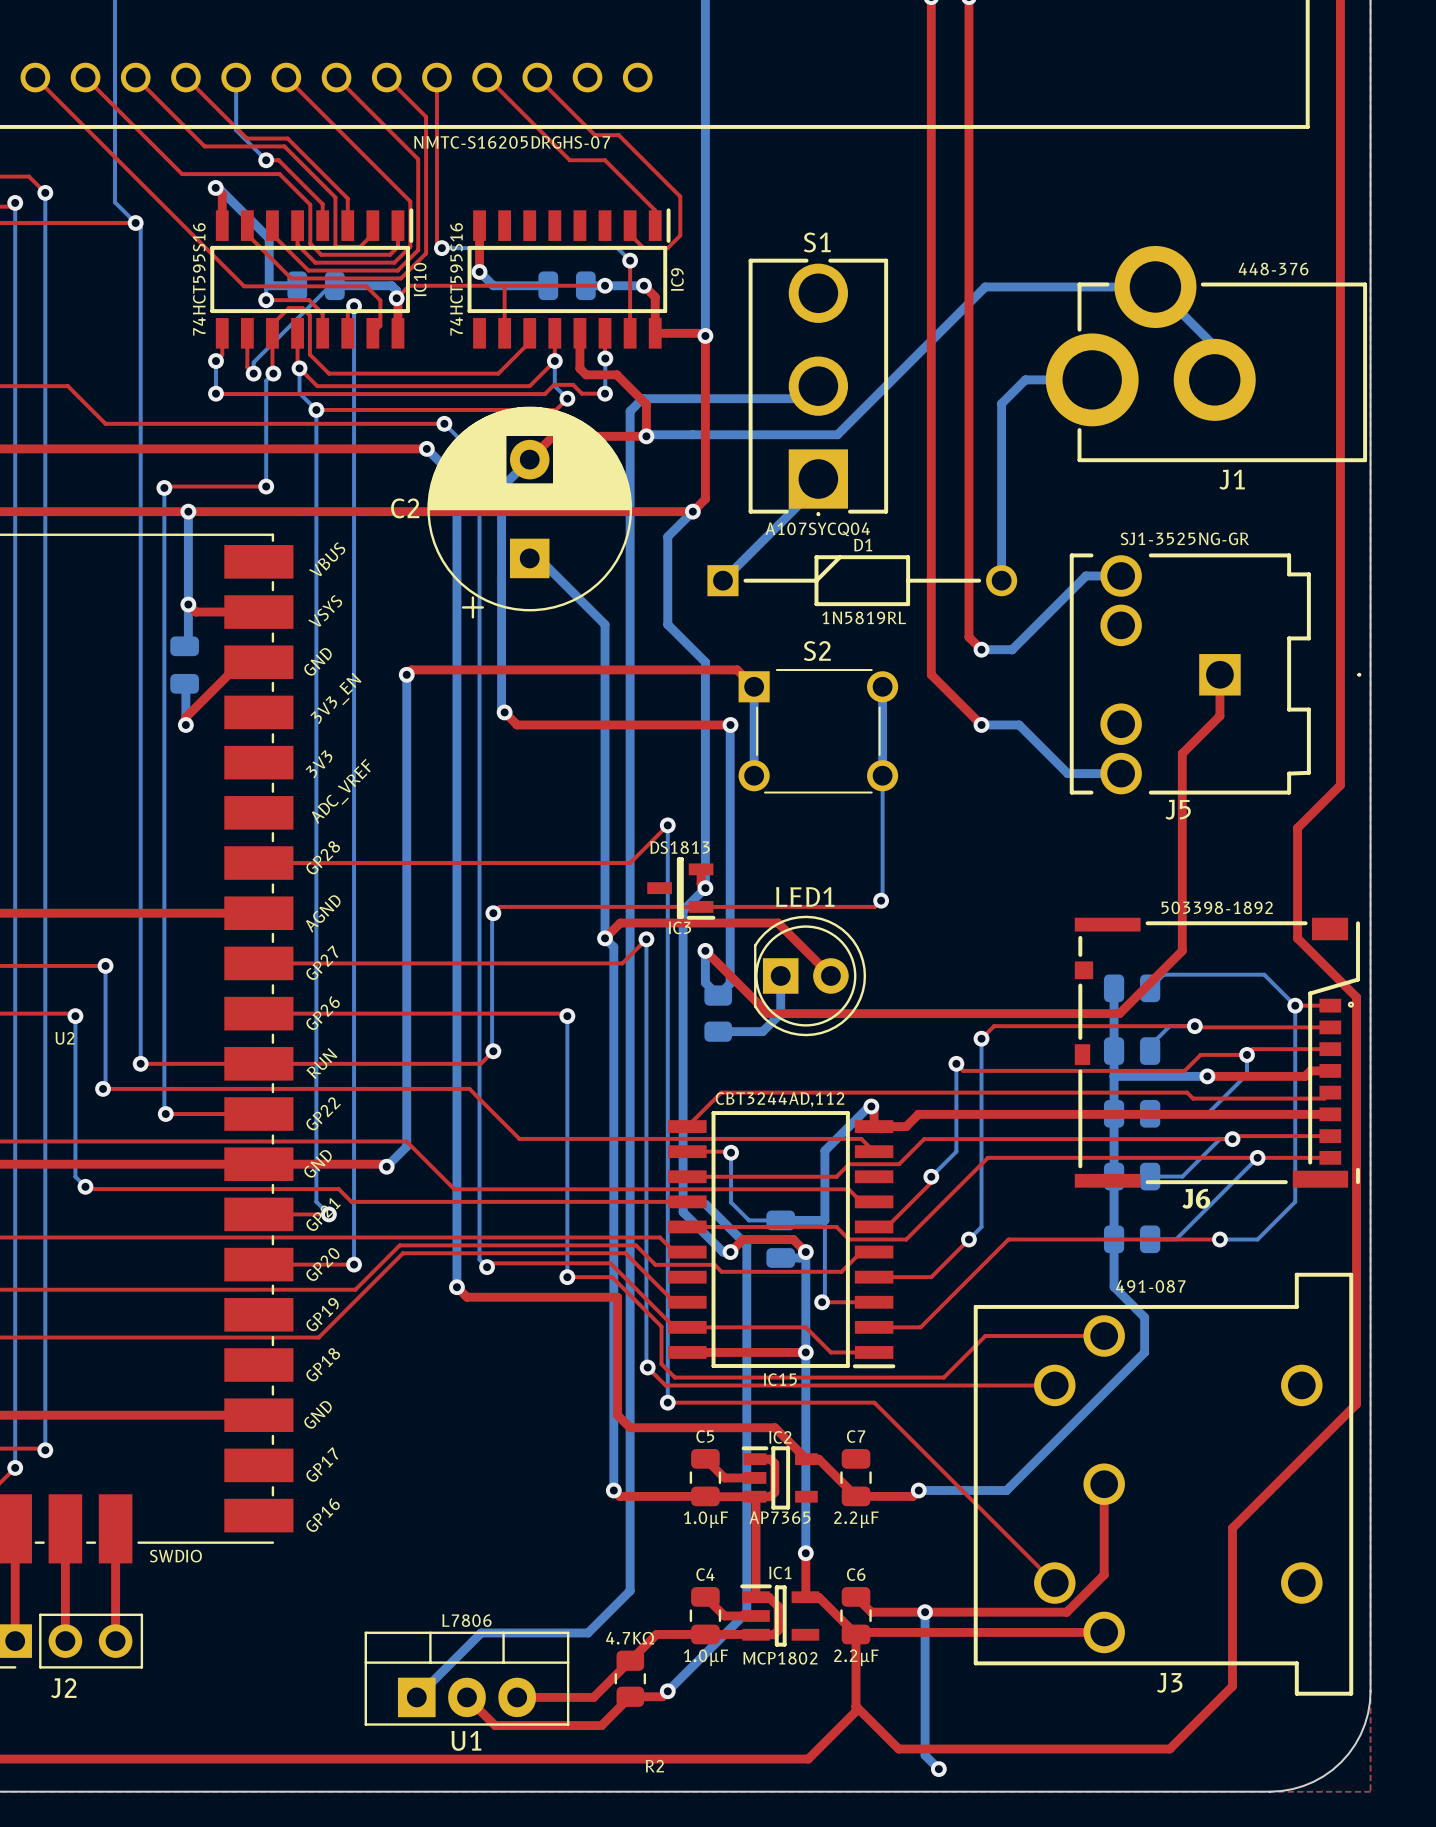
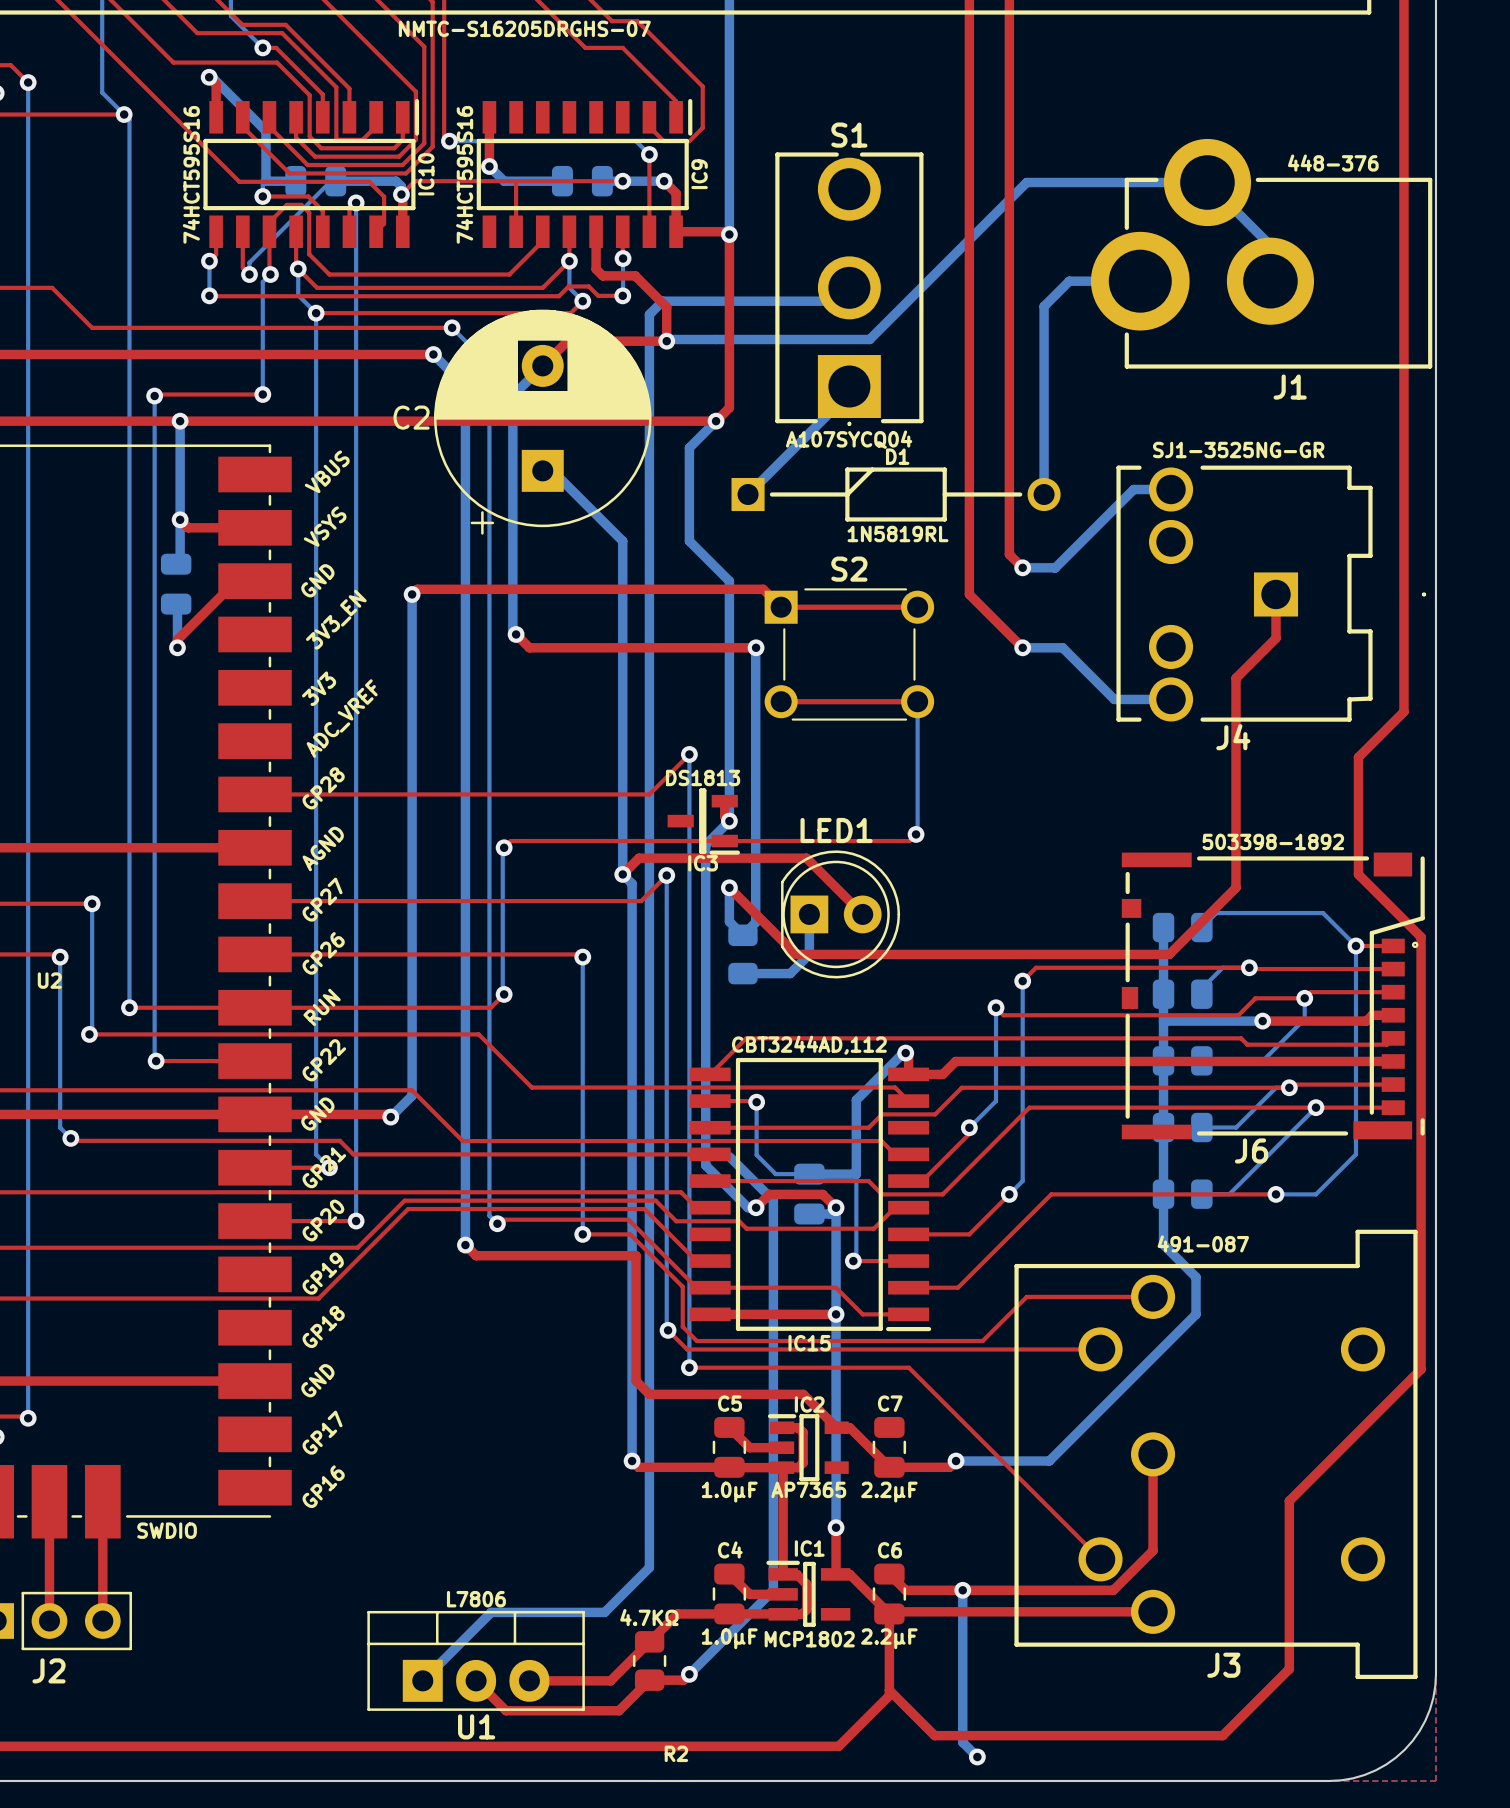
top track: none -> (781, 607) (917, 607)
bottom track: (754, 686) (754, 775) -> none
bottom track: (882, 686) (882, 775) -> none
top track: none -> (781, 701) (917, 701)
J5 name: J5 (1178, 809) -> J4 (1233, 737)

